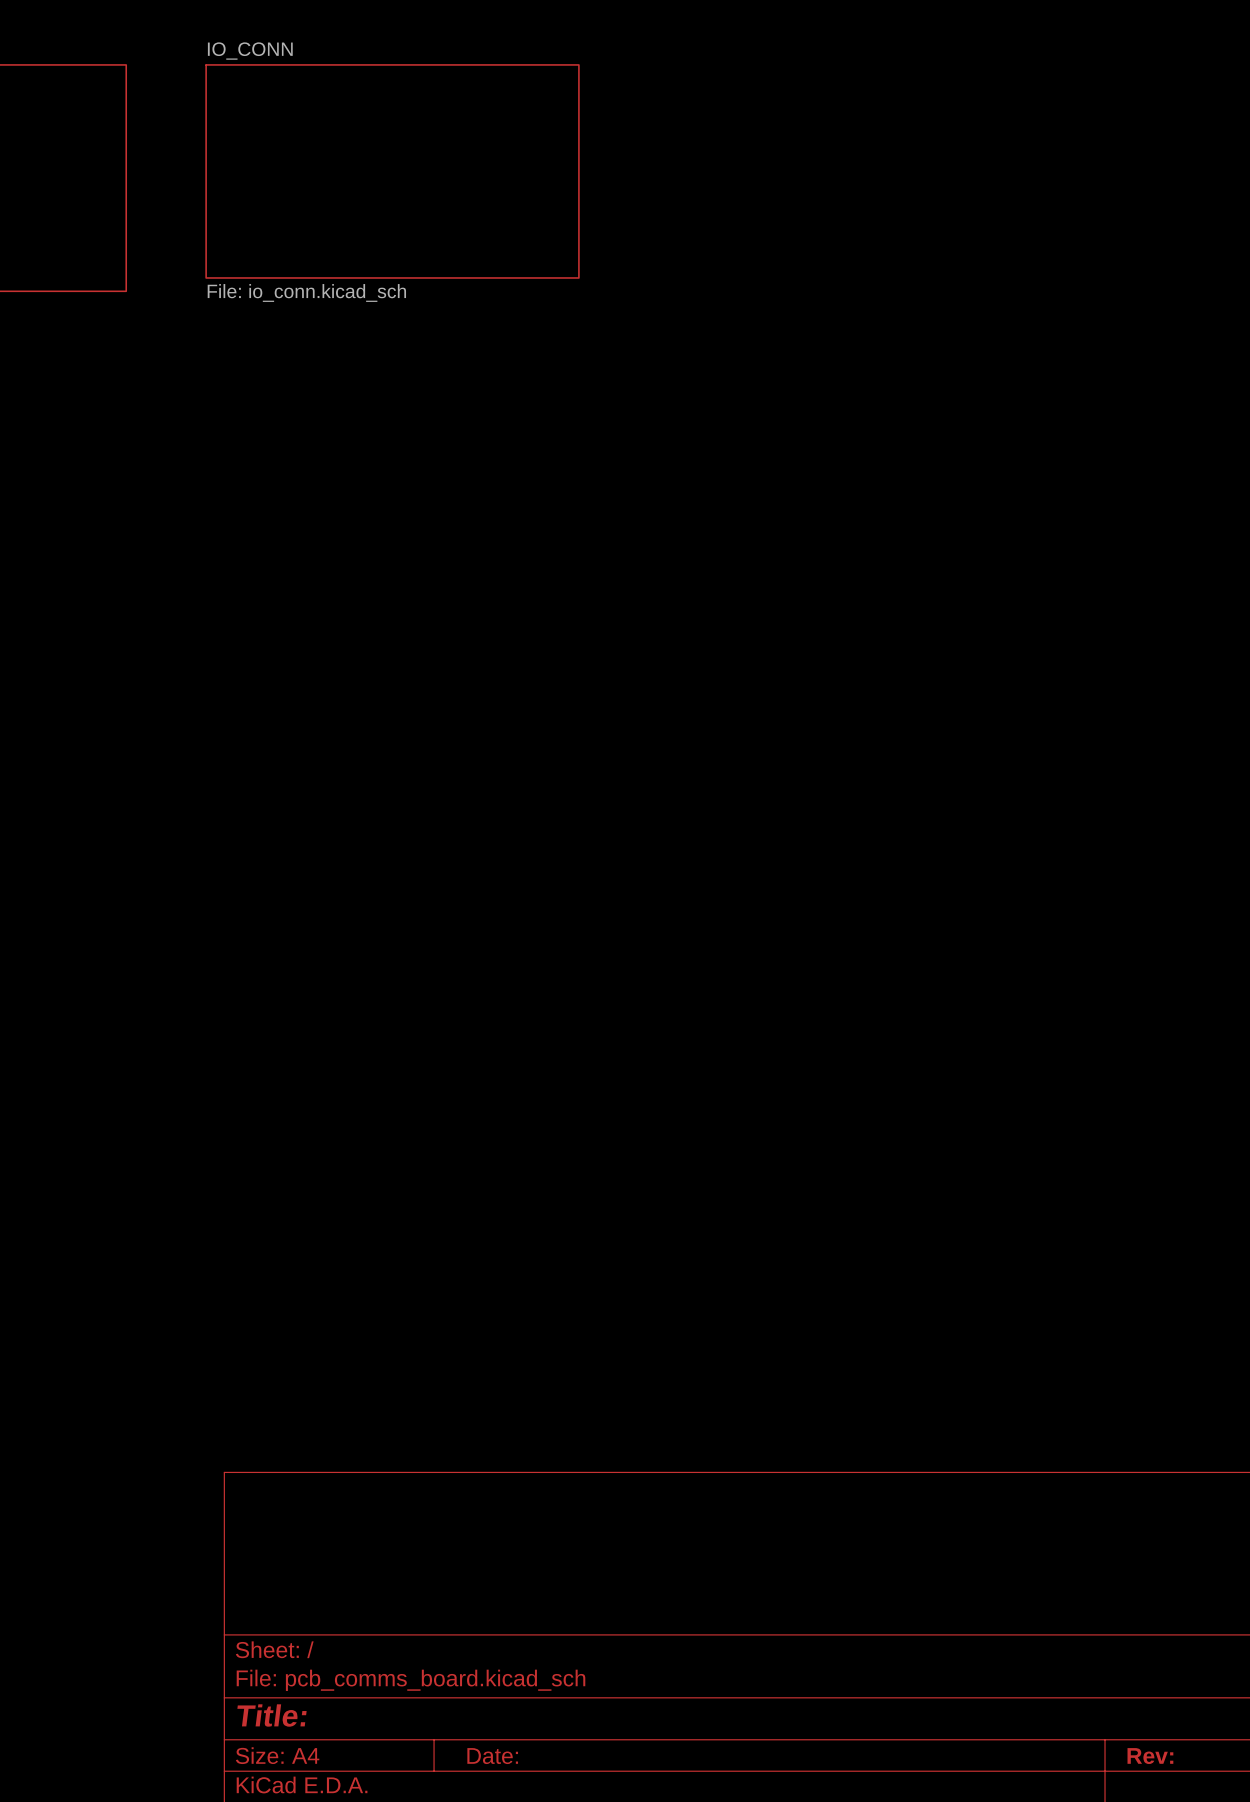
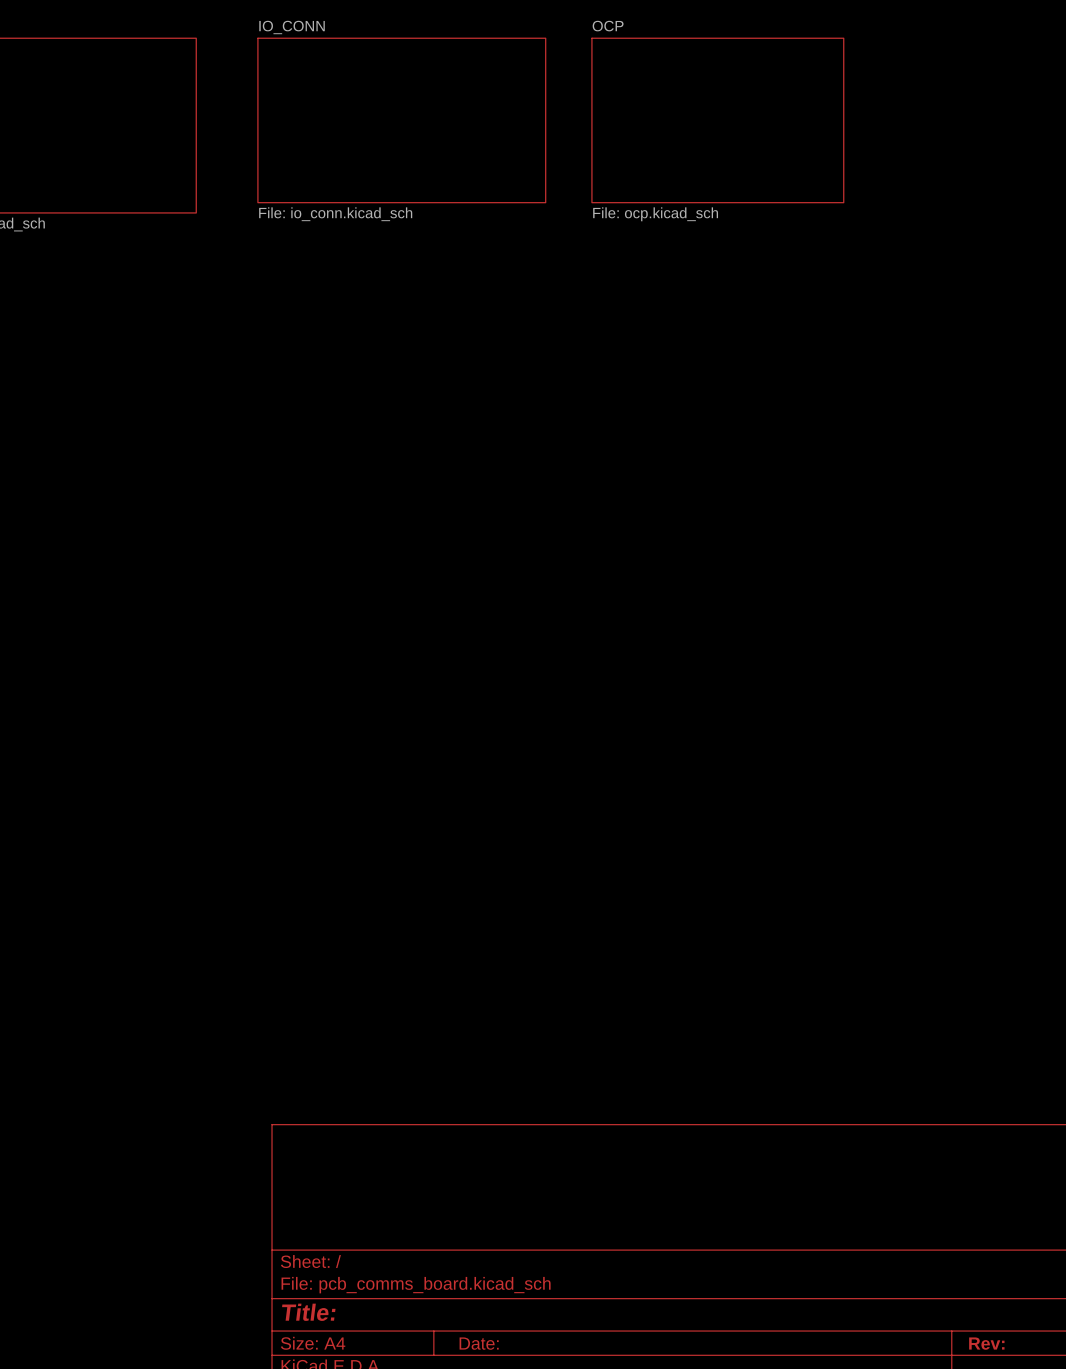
sheet OCP: none -> File: ocp.kicad_sch (717, 120)

